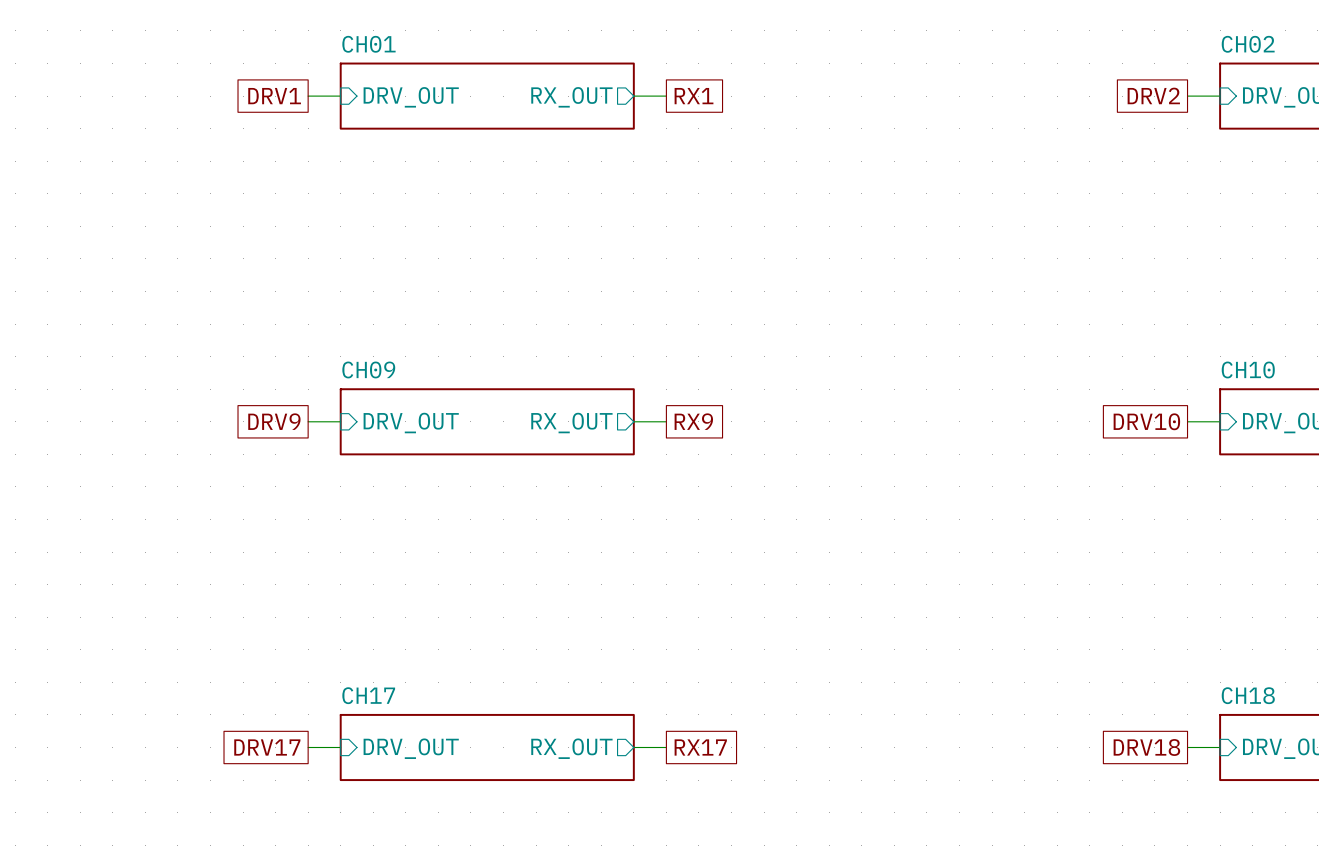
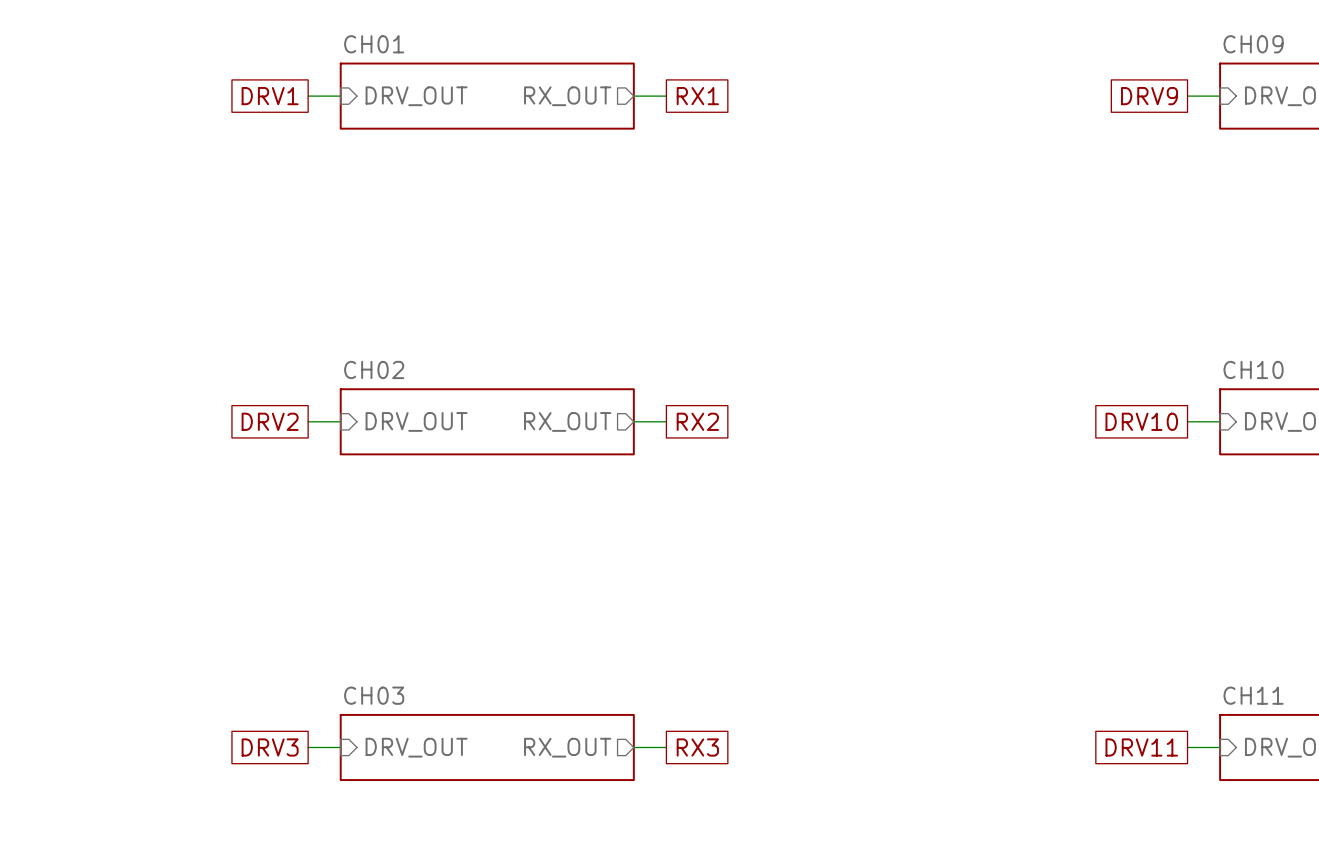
sheet CH02 name: CH02 (1248, 44) -> CH09 (1253, 44)
global label: DRV2 (1153, 95) -> DRV9 (1149, 96)
sheet CH09 name: CH09 (368, 369) -> CH02 (374, 369)
global label: DRV9 (274, 421) -> DRV2 (270, 421)
global label: RX9 (693, 421) -> RX2 (697, 421)
sheet CH17 name: CH17 (368, 695) -> CH03 (374, 695)
sheet CH18 name: CH18 (1248, 695) -> CH11 (1253, 695)
global label: DRV17 (267, 747) -> DRV3 (270, 747)
global label: RX17 (700, 747) -> RX3 (697, 747)
global label: DRV18 (1146, 747) -> DRV11 (1141, 747)

